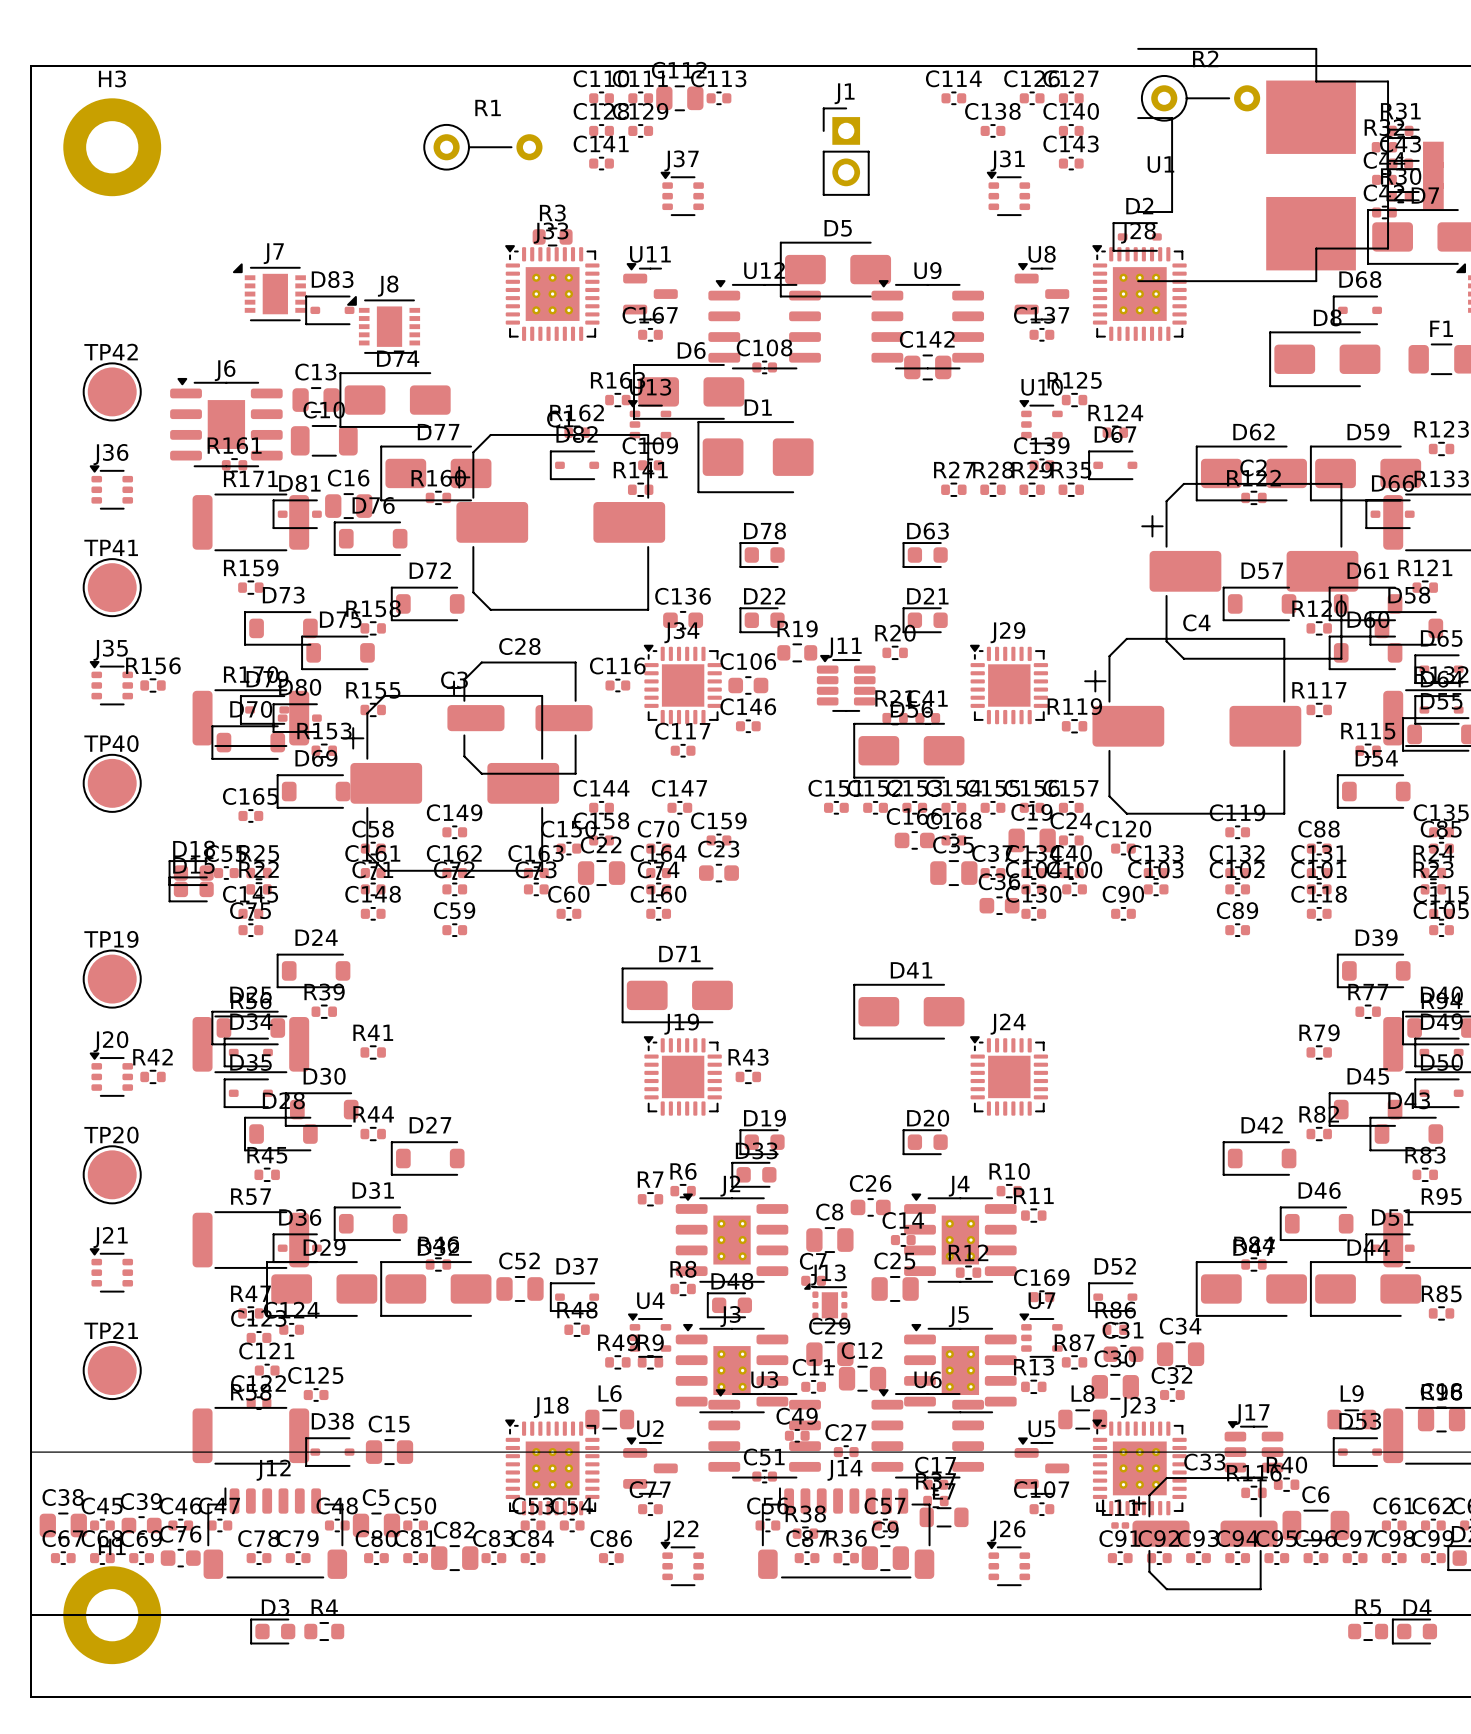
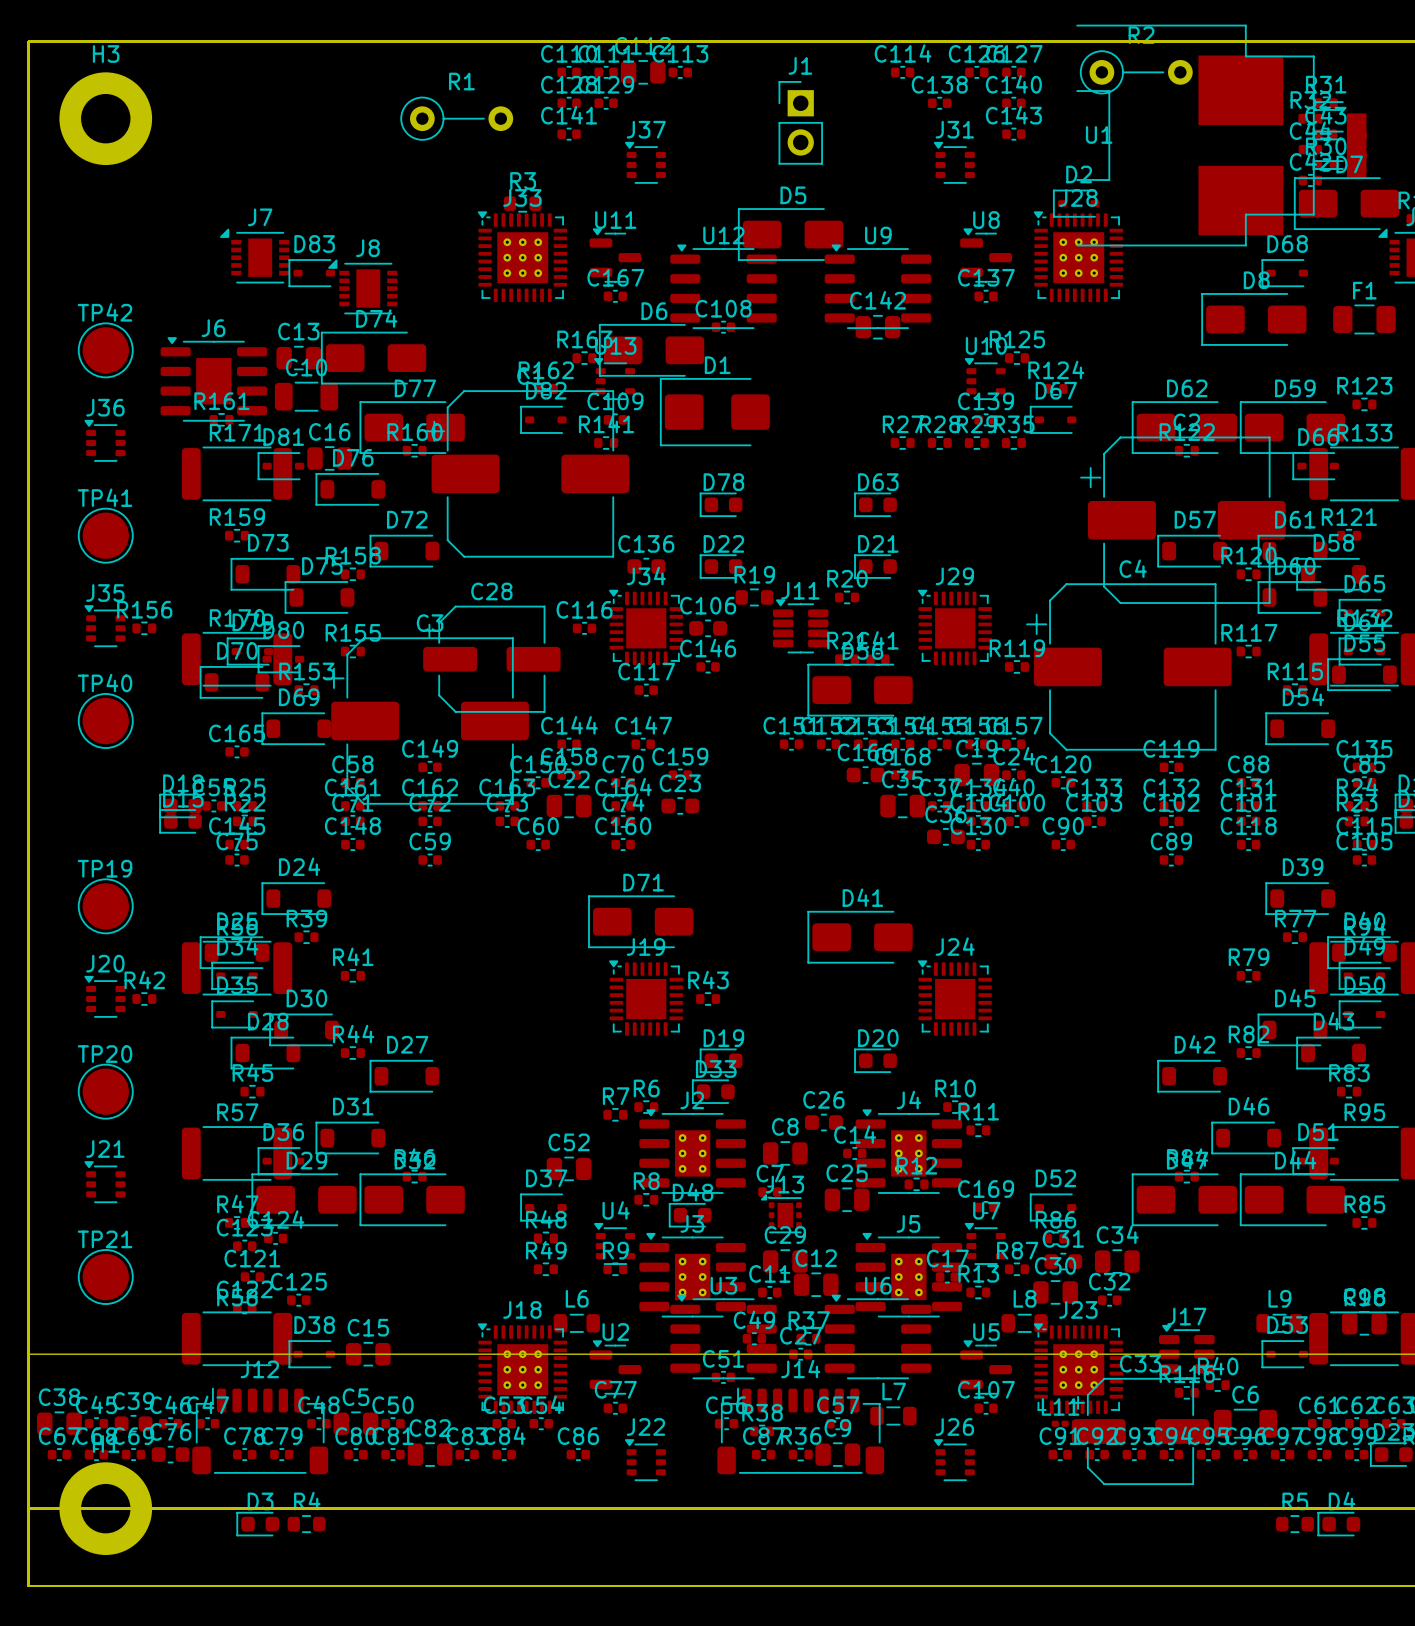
C52 position: (519, 1288) -> (569, 1168)
R49 position: (617, 1362) -> (545, 1269)
C17 position: (935, 1484) -> (947, 1276)
R37 position: (935, 1501) -> (808, 1338)

